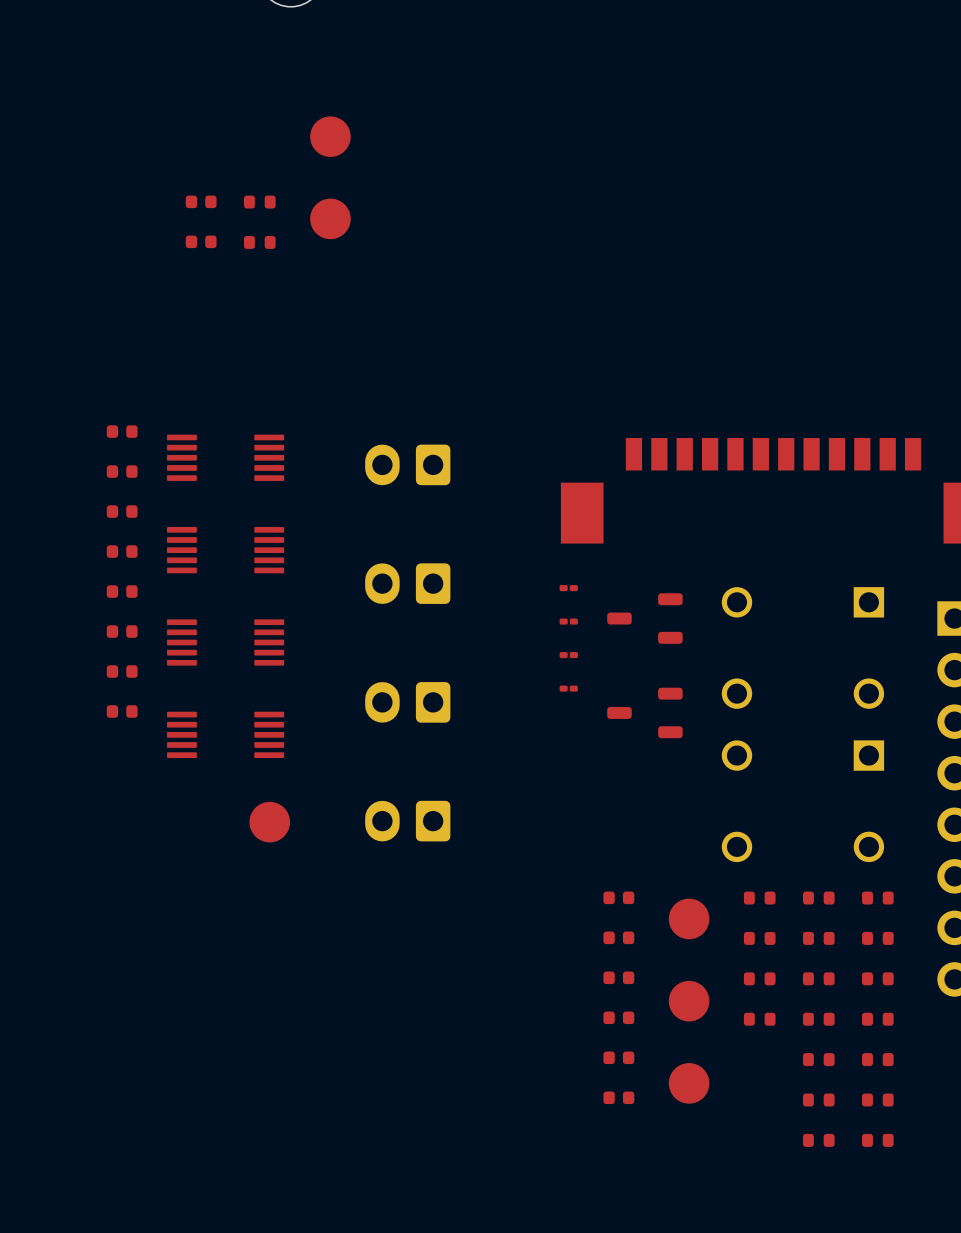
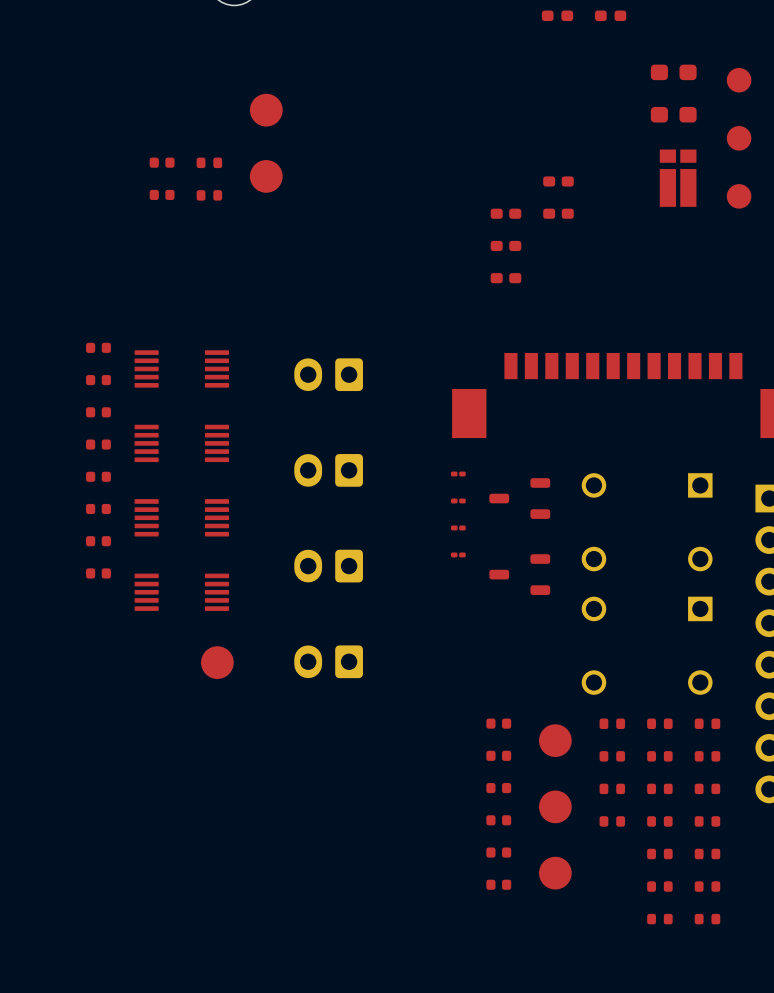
part: none -> (557, 15)
part: none -> (610, 15)
part: none -> (673, 72)
part: none -> (739, 80)
part: none -> (673, 114)
part: none -> (739, 138)
part: none -> (678, 178)
part: none -> (558, 181)
part: none -> (739, 196)
part: none -> (505, 213)
part: none -> (558, 213)
part: none -> (505, 245)
part: none -> (505, 278)

